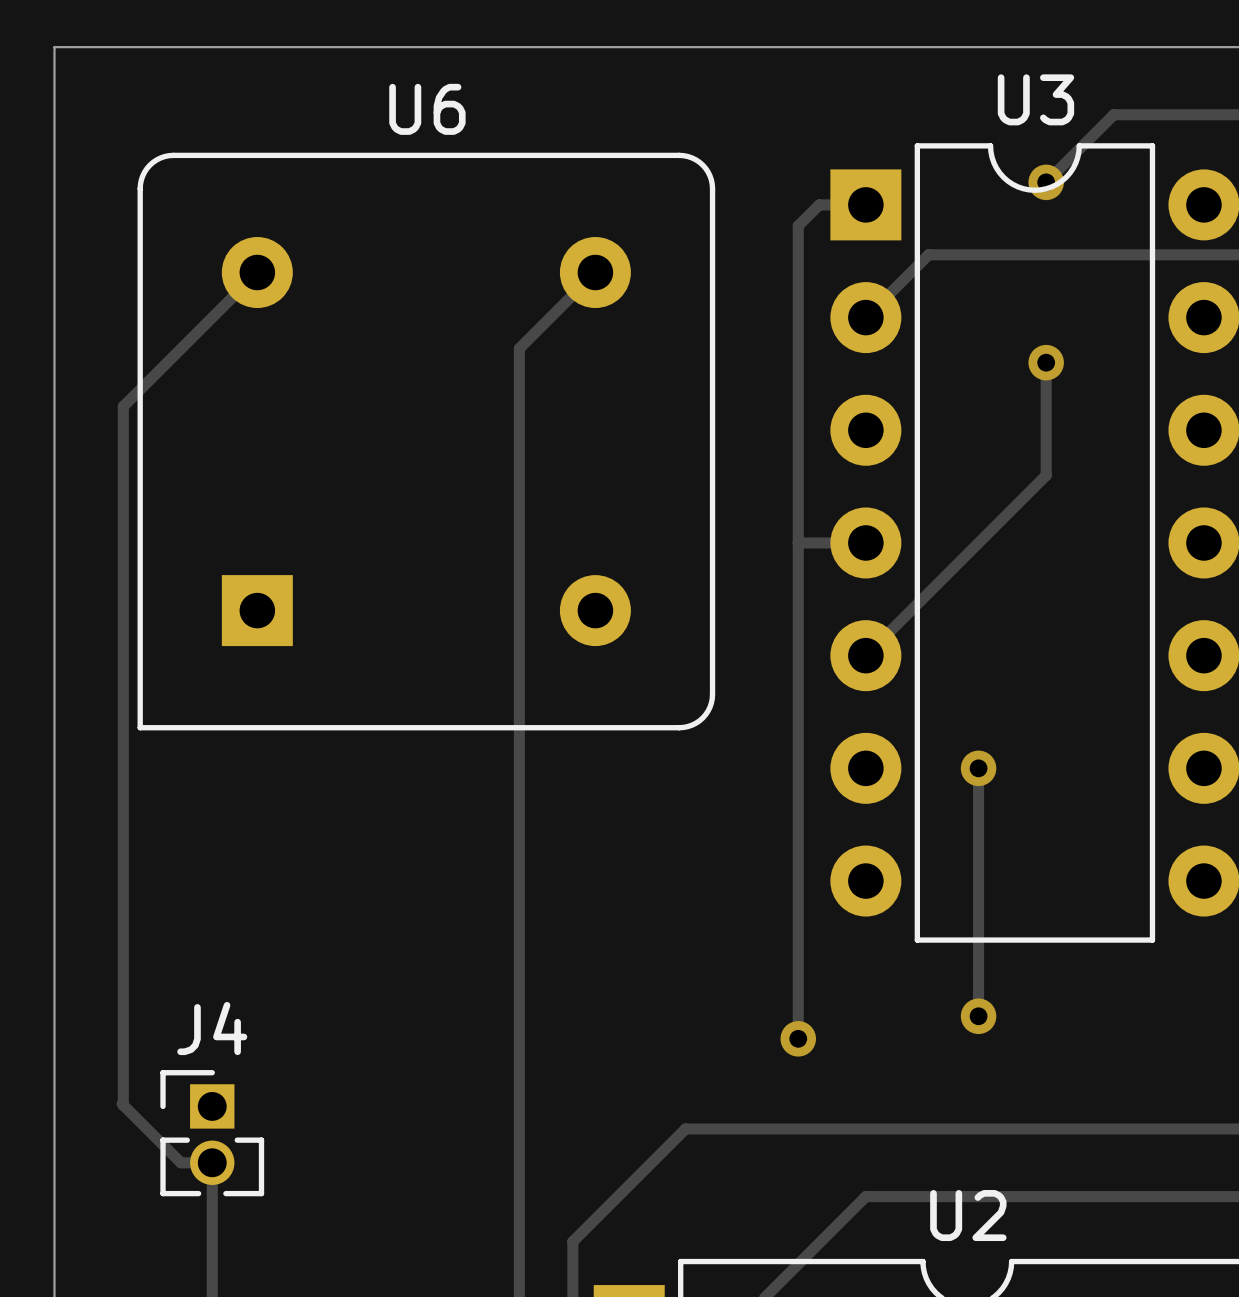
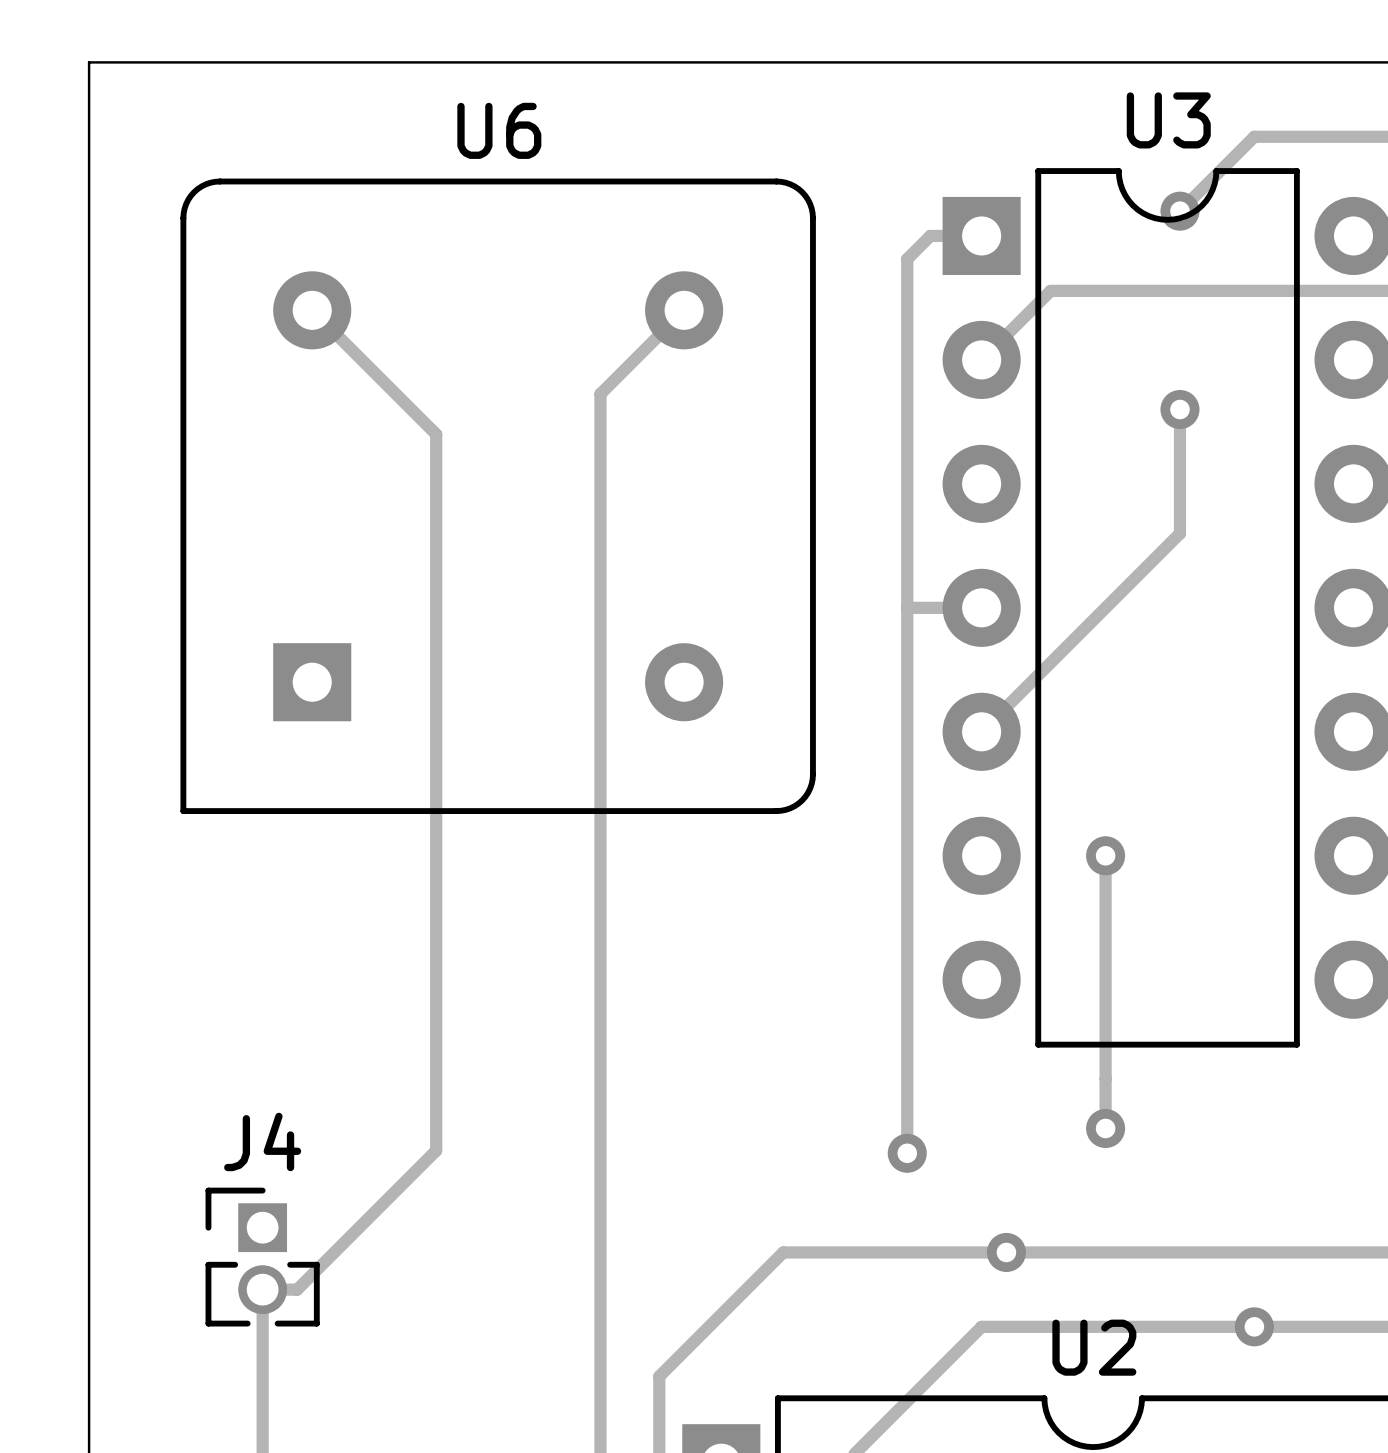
track: (257, 272) (123, 406) (123, 1105) -> (312, 310) (436, 434) (436, 1150) (297, 1289) (262, 1289)
track: (122, 1103) (180, 1162) (212, 1162) -> none
via: none -> (1006, 1252)
via: none -> (1254, 1326)

